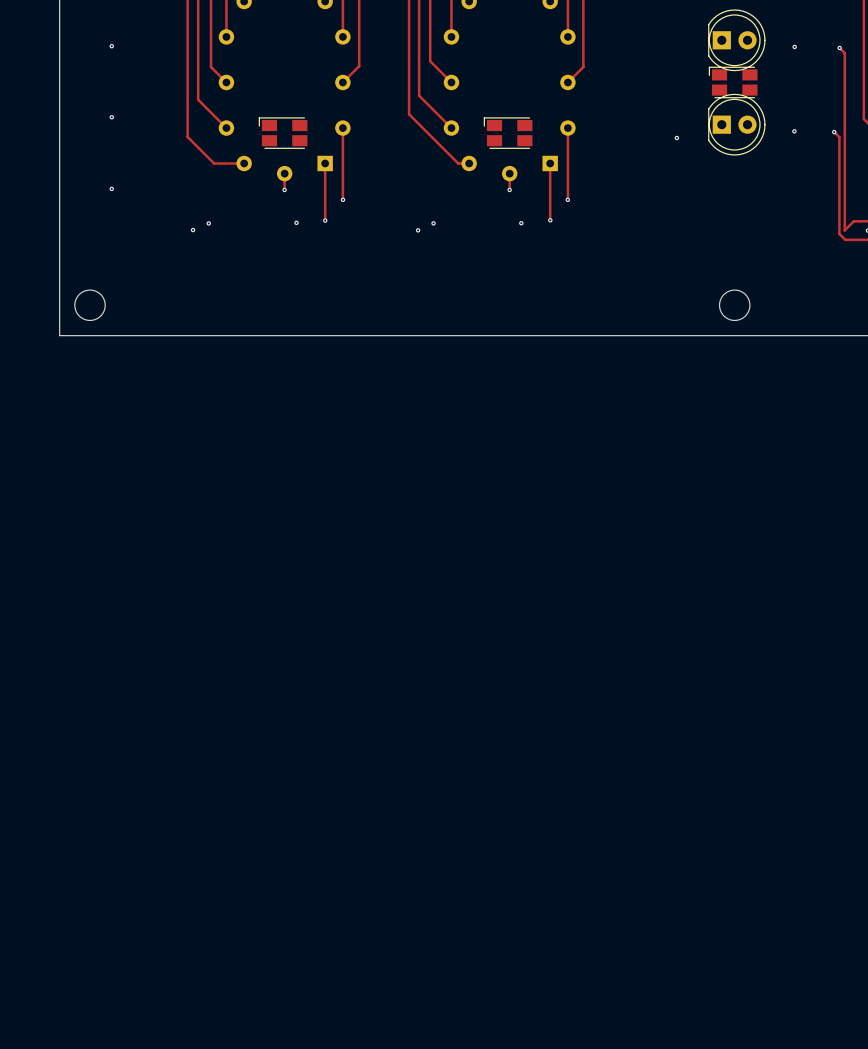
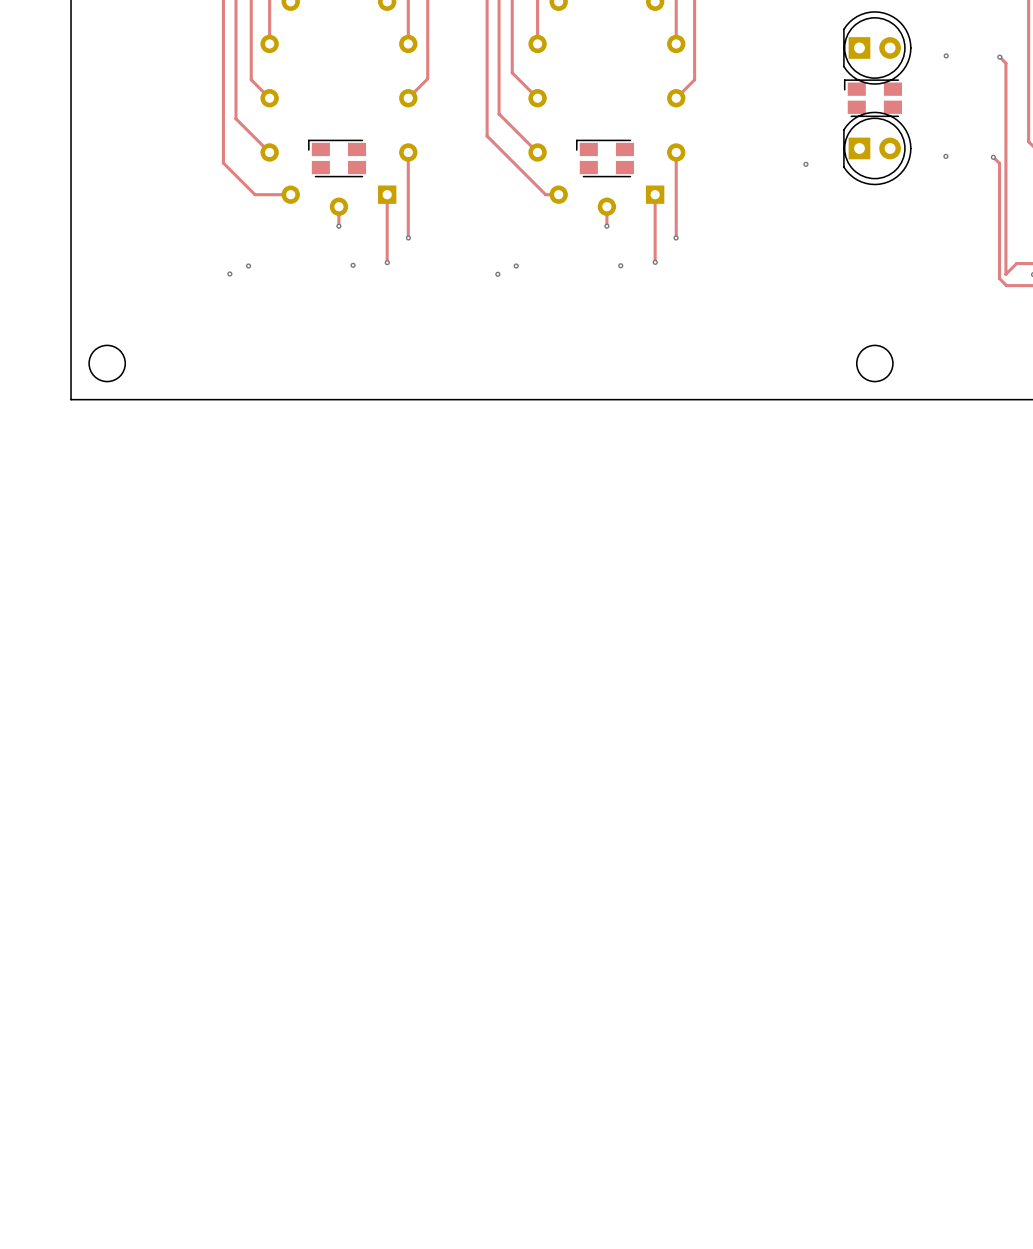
via: (111, 46) -> none
via: (111, 117) -> none
via: (111, 188) -> none

